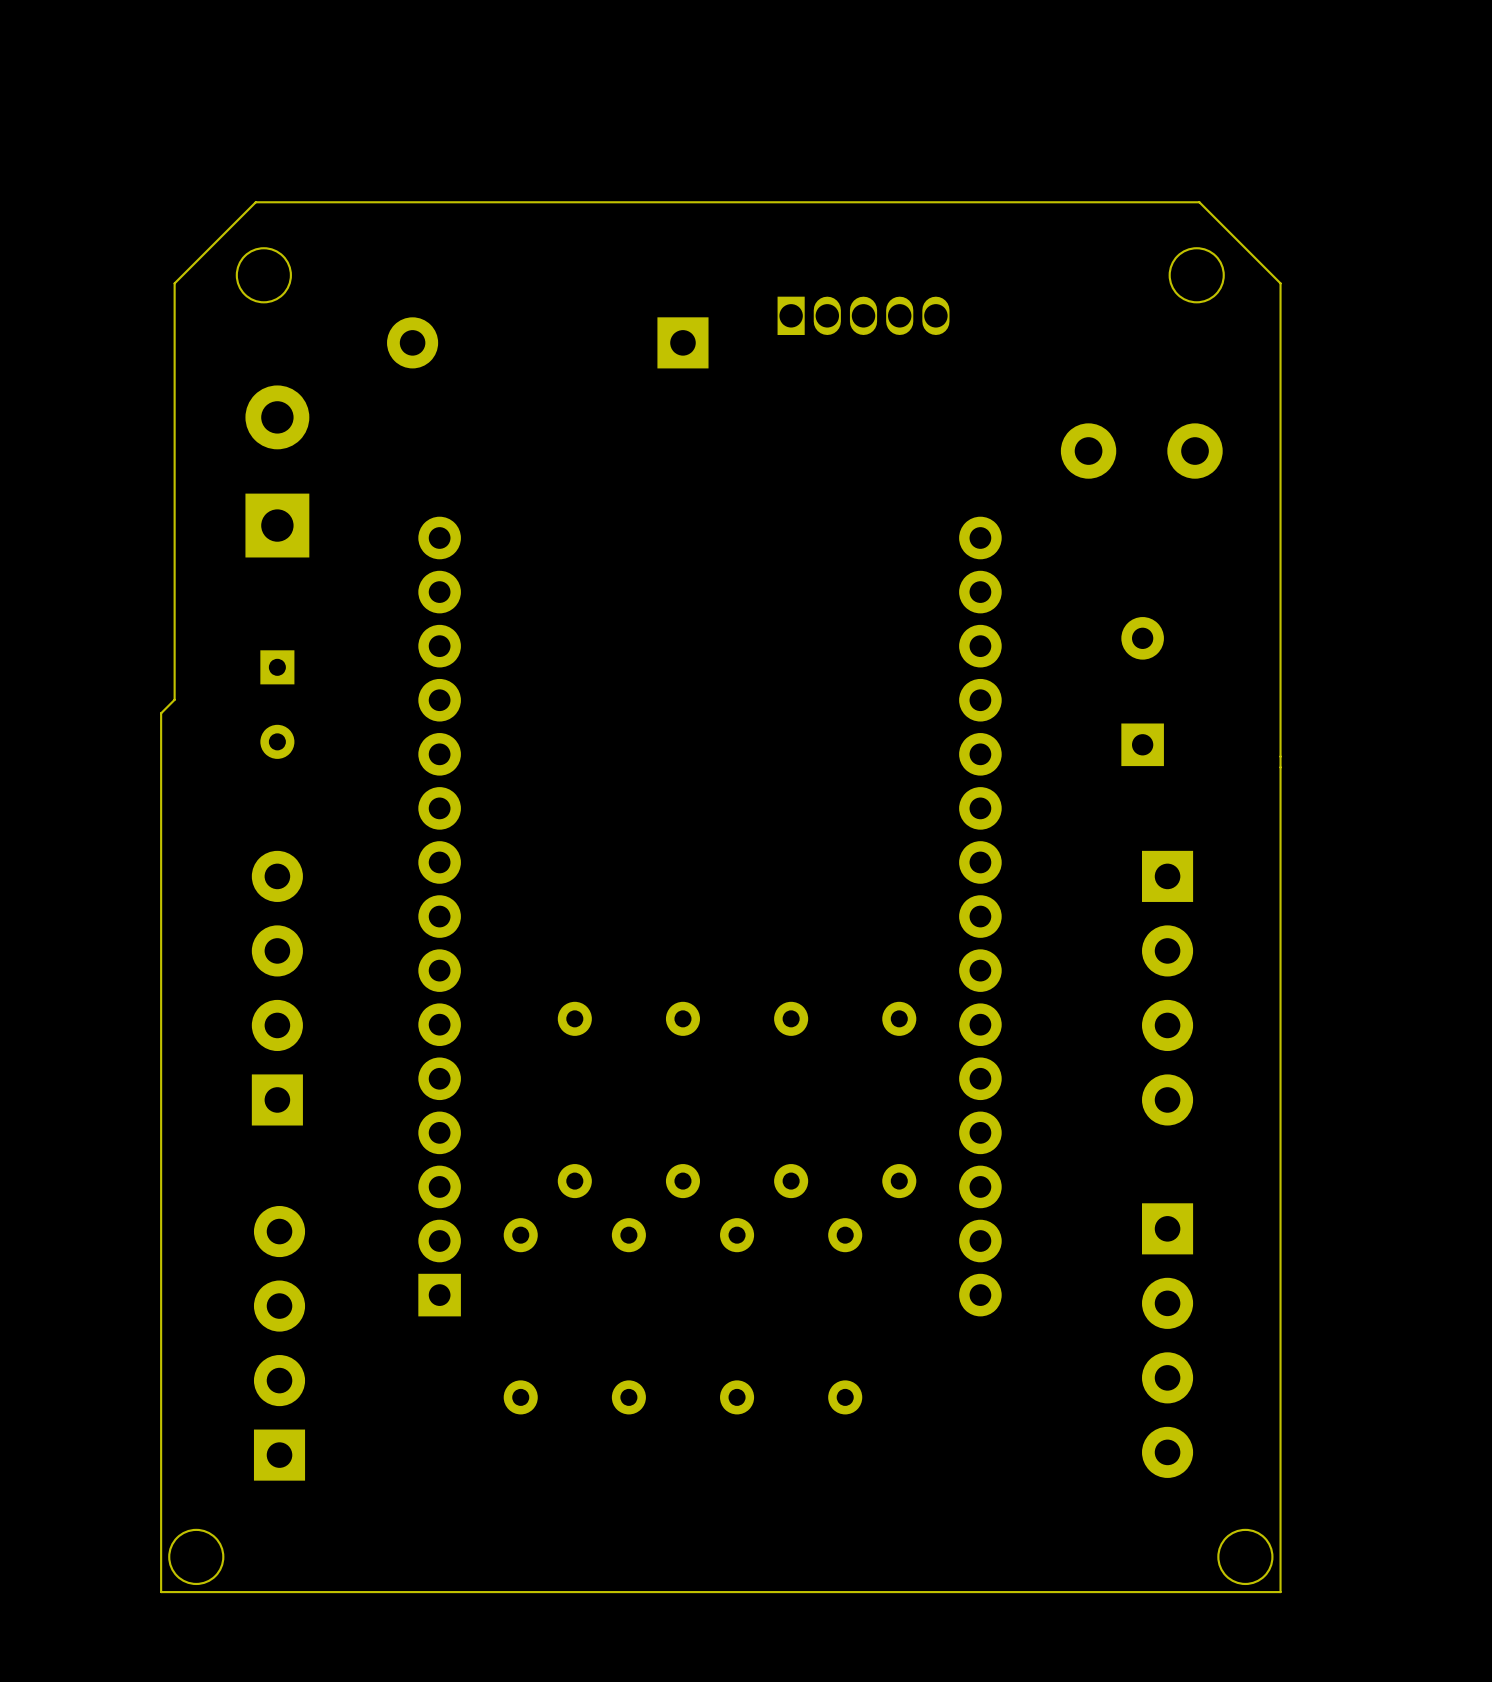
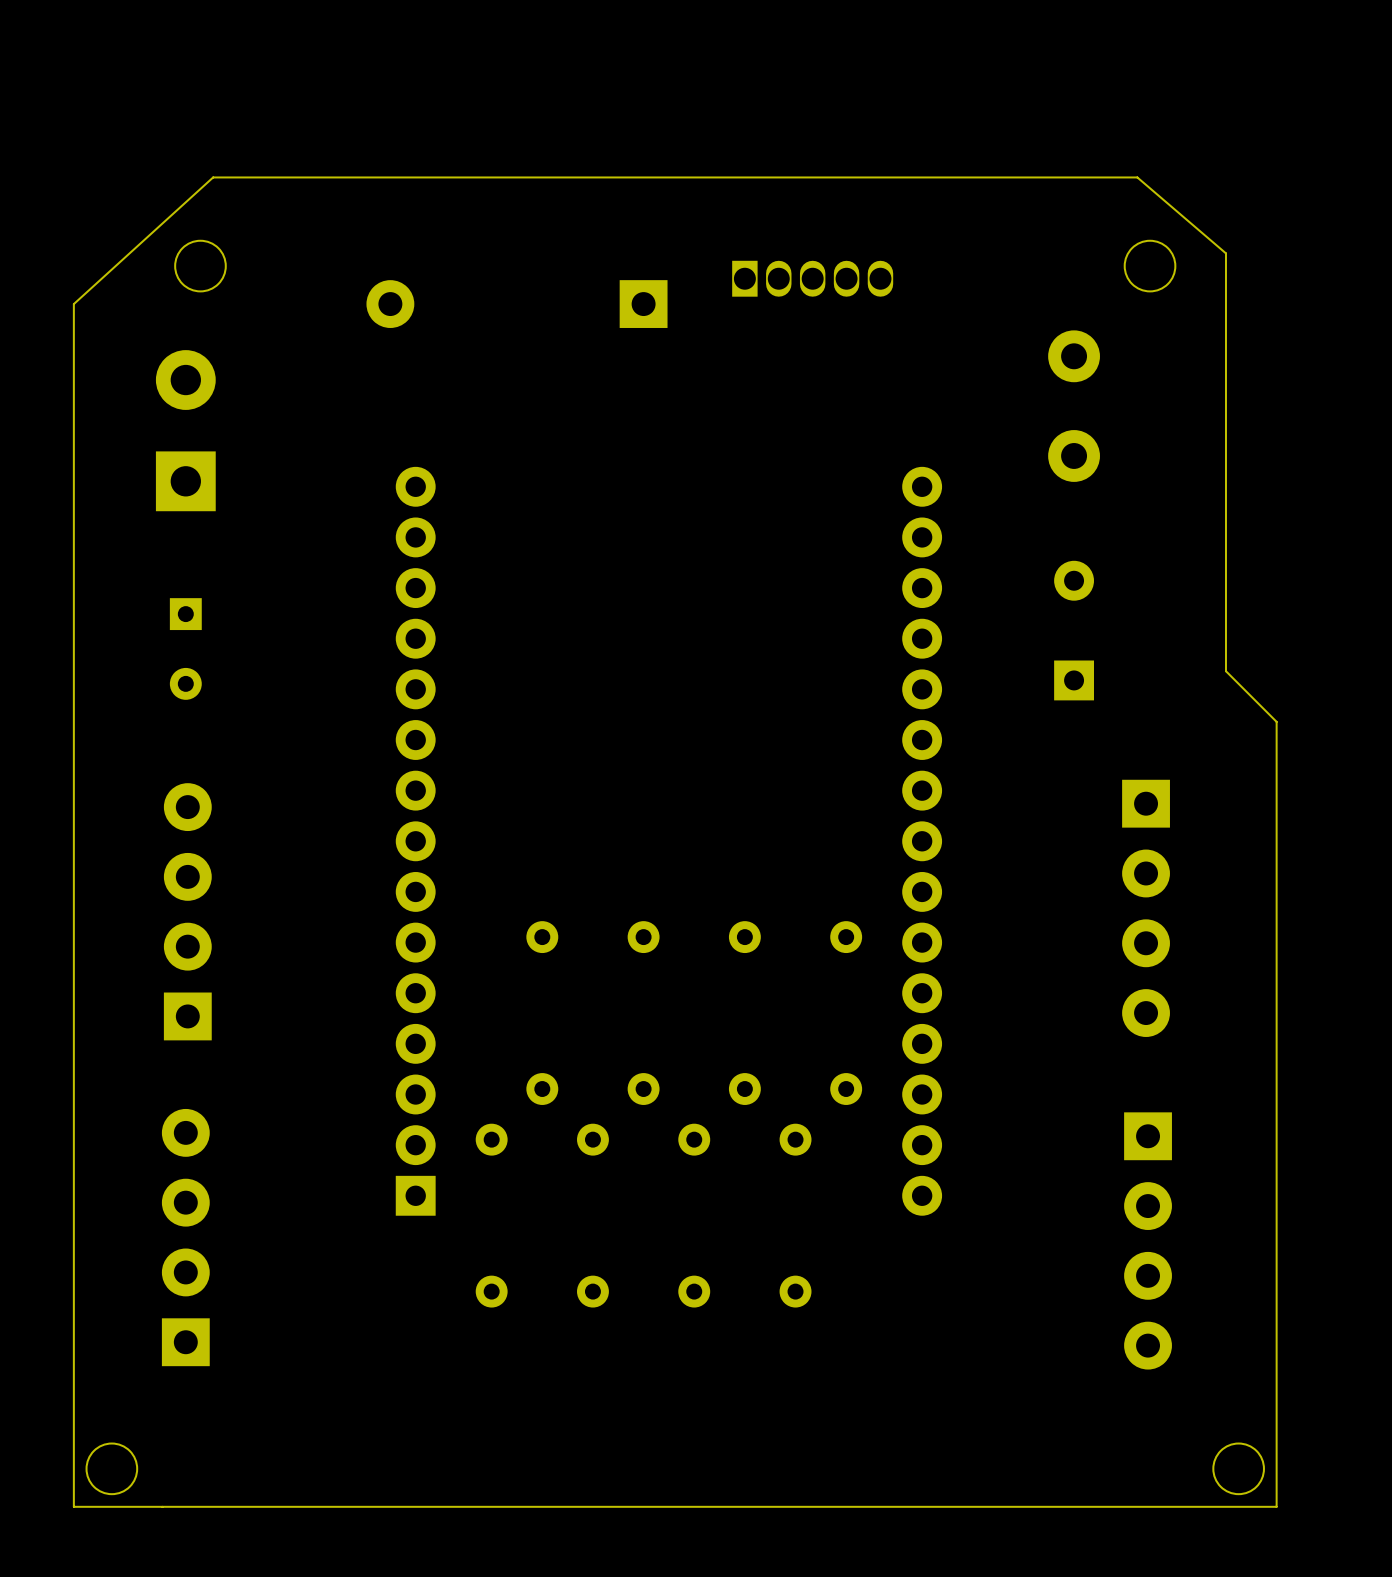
board edge: (1199, 202) (1280, 283) (1280, 1592) (161, 1592) (161, 713) (174, 699) (174, 283) (255, 202) (1199, 202) -> (1137, 177) (1225, 253) (1225, 671) (1276, 721) (1276, 1506) (73, 1506) (73, 304) (213, 177) (1137, 177)
round board edge position: (263, 275) -> (200, 266)
round board edge position: (1196, 275) -> (1150, 266)
part rotation: 0° (1141, 451) -> 90° clockwise (1074, 406)
part position: (277, 471) -> (185, 430)
part position: (277, 704) -> (185, 648)
part position: (277, 988) -> (187, 911)
part position: (1167, 988) -> (1146, 908)
part position: (1167, 1340) -> (1148, 1240)
part position: (279, 1343) -> (185, 1237)
round board edge position: (196, 1556) -> (111, 1468)
round board edge position: (1245, 1556) -> (1238, 1468)

